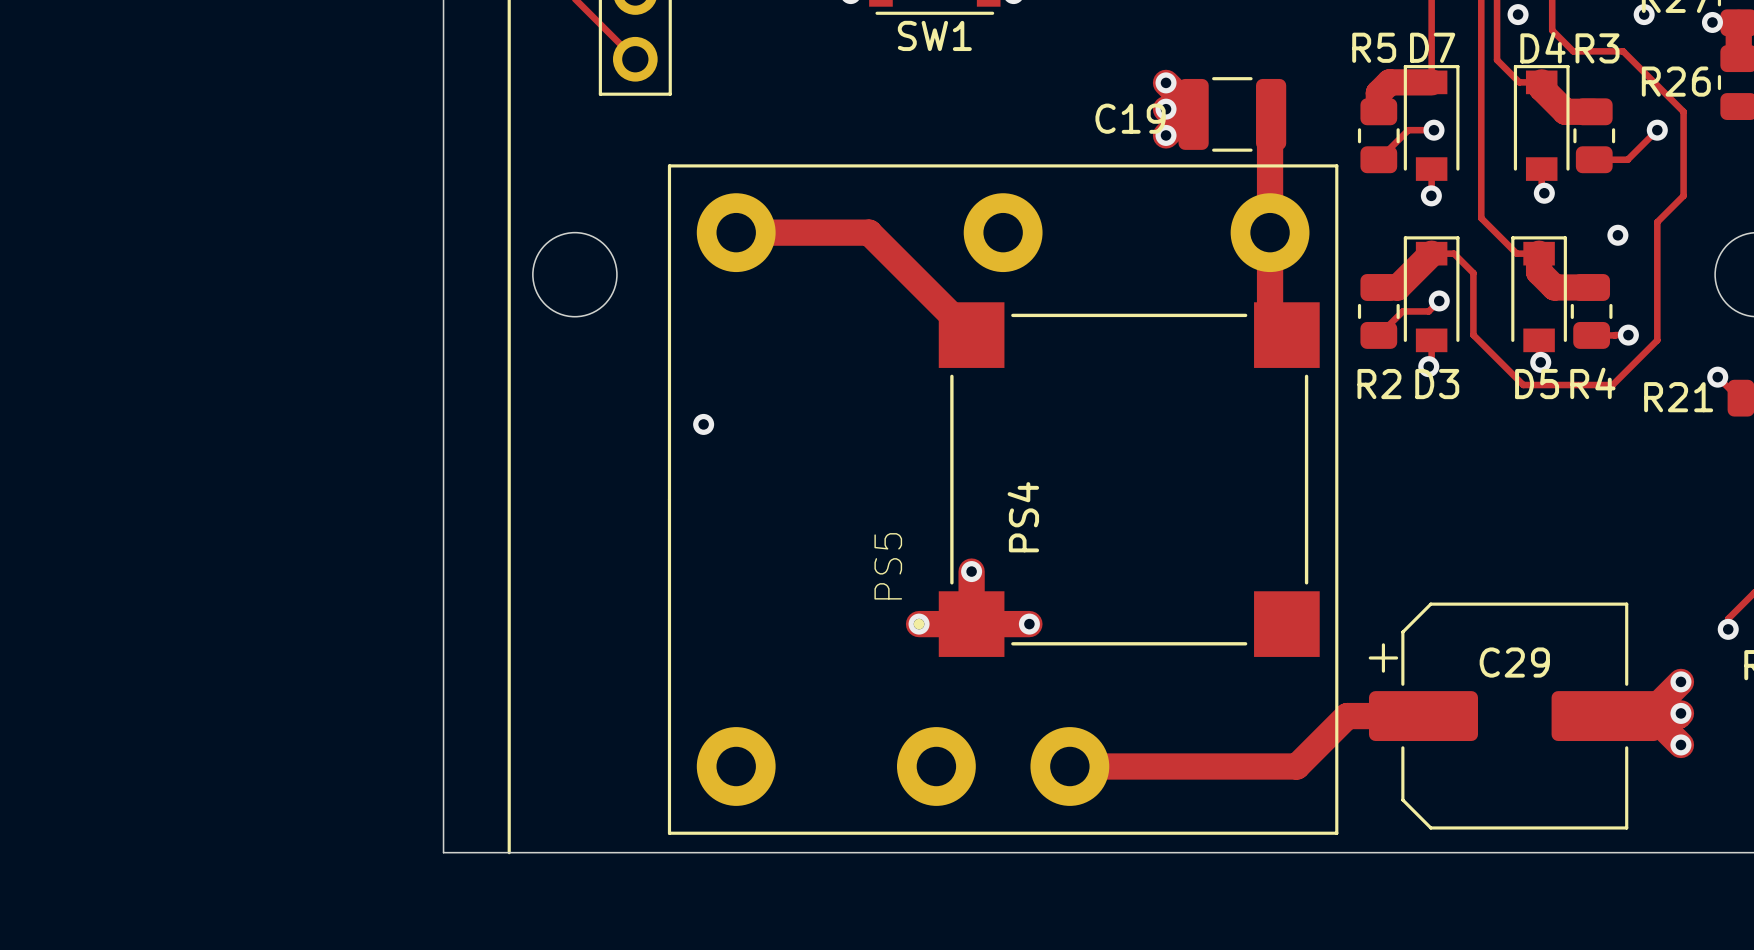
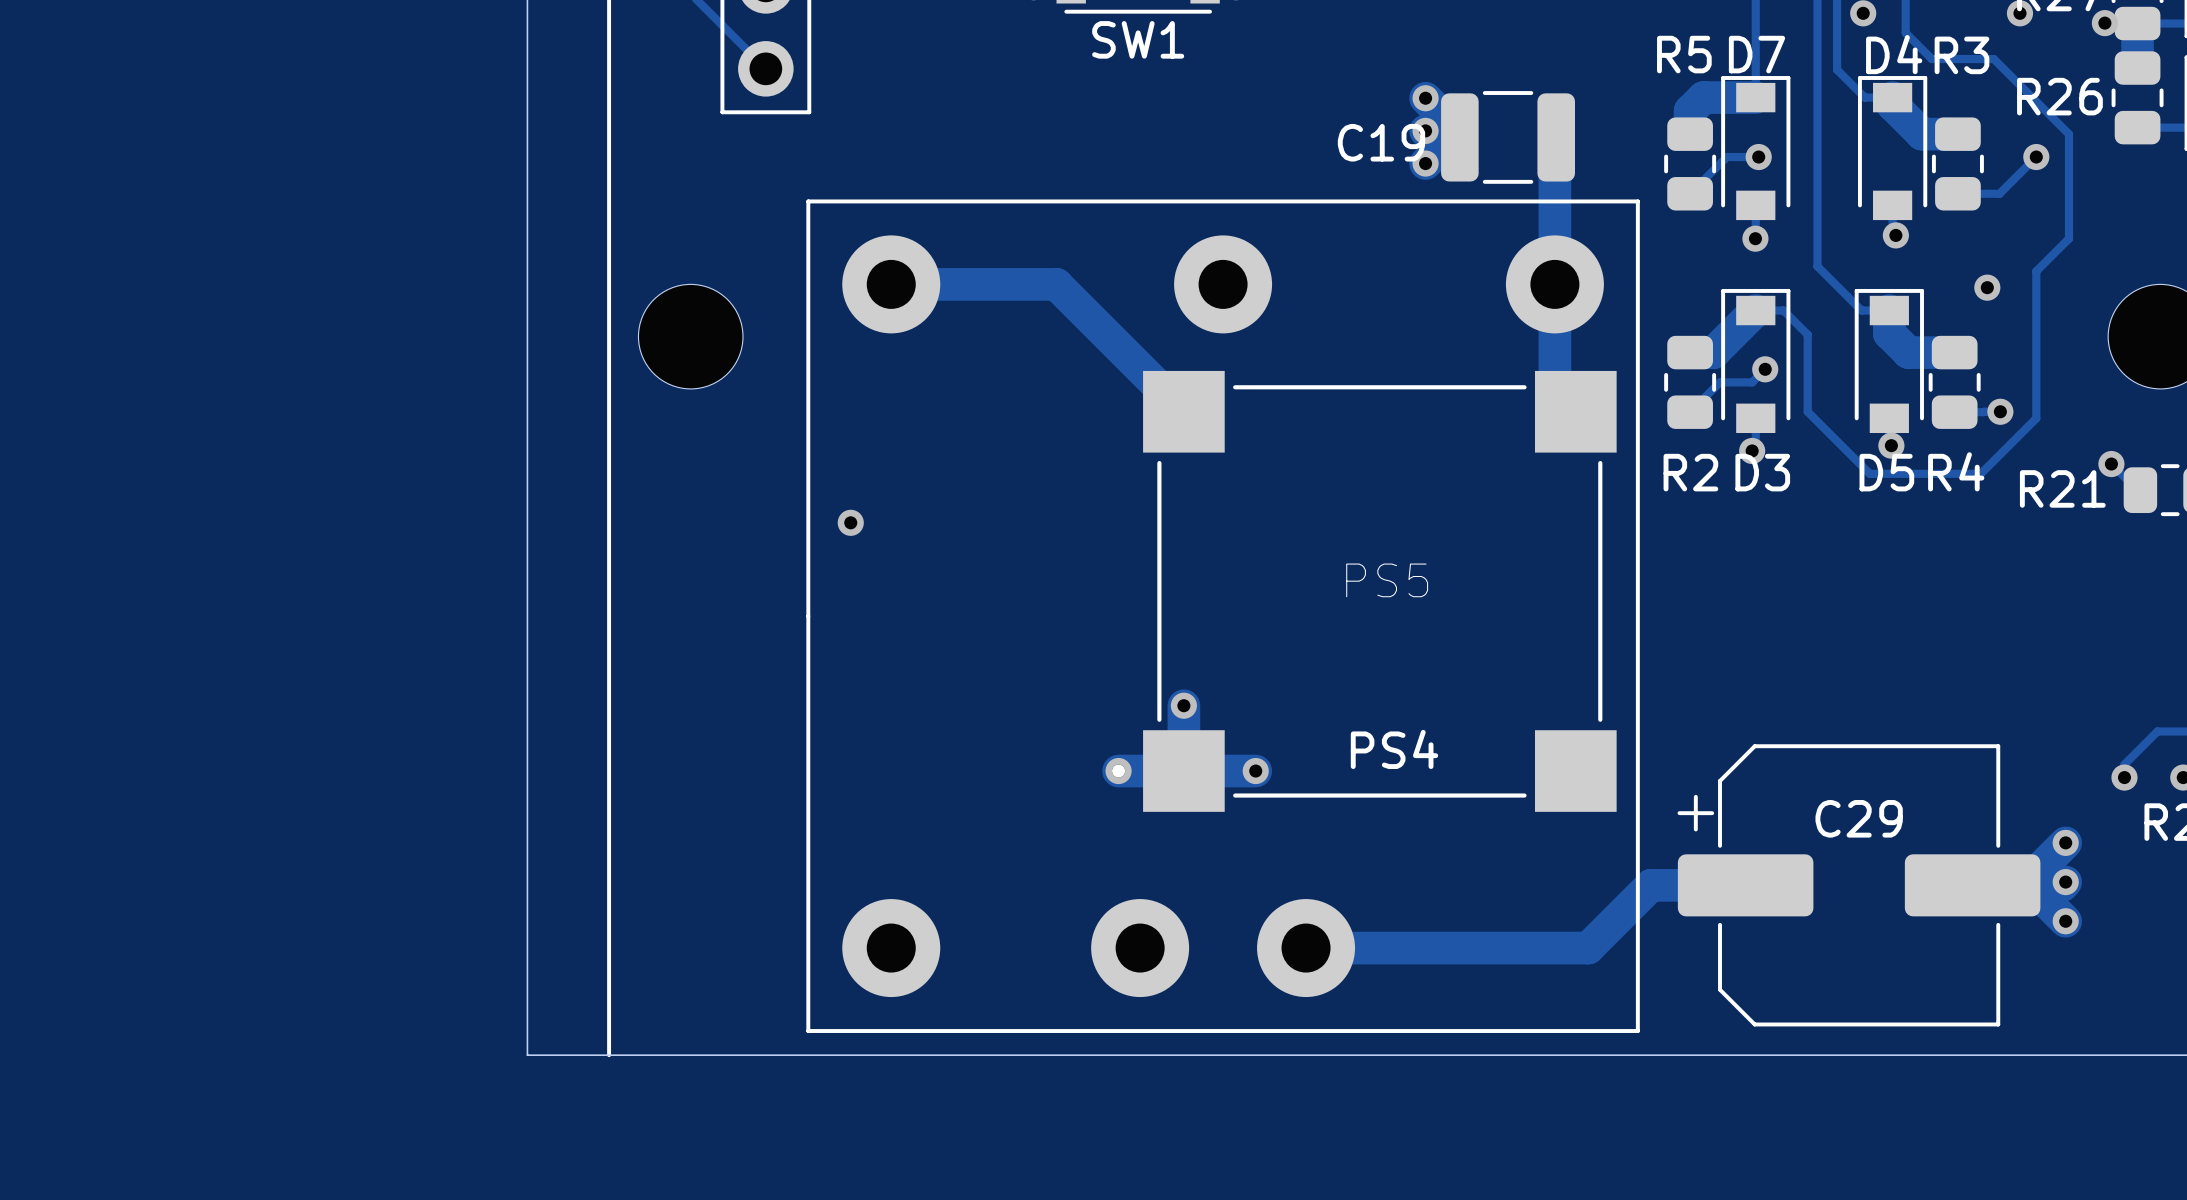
PS4 name rotation: 0° (1023, 517) -> 90° clockwise (1394, 749)
PS4 name position: PS4 (1023, 517) -> PS4 (1394, 749)
PS5 name rotation: 0° (888, 566) -> 90° clockwise (1387, 580)
PS5 name position: PS5 (888, 566) -> PS5 (1387, 580)

